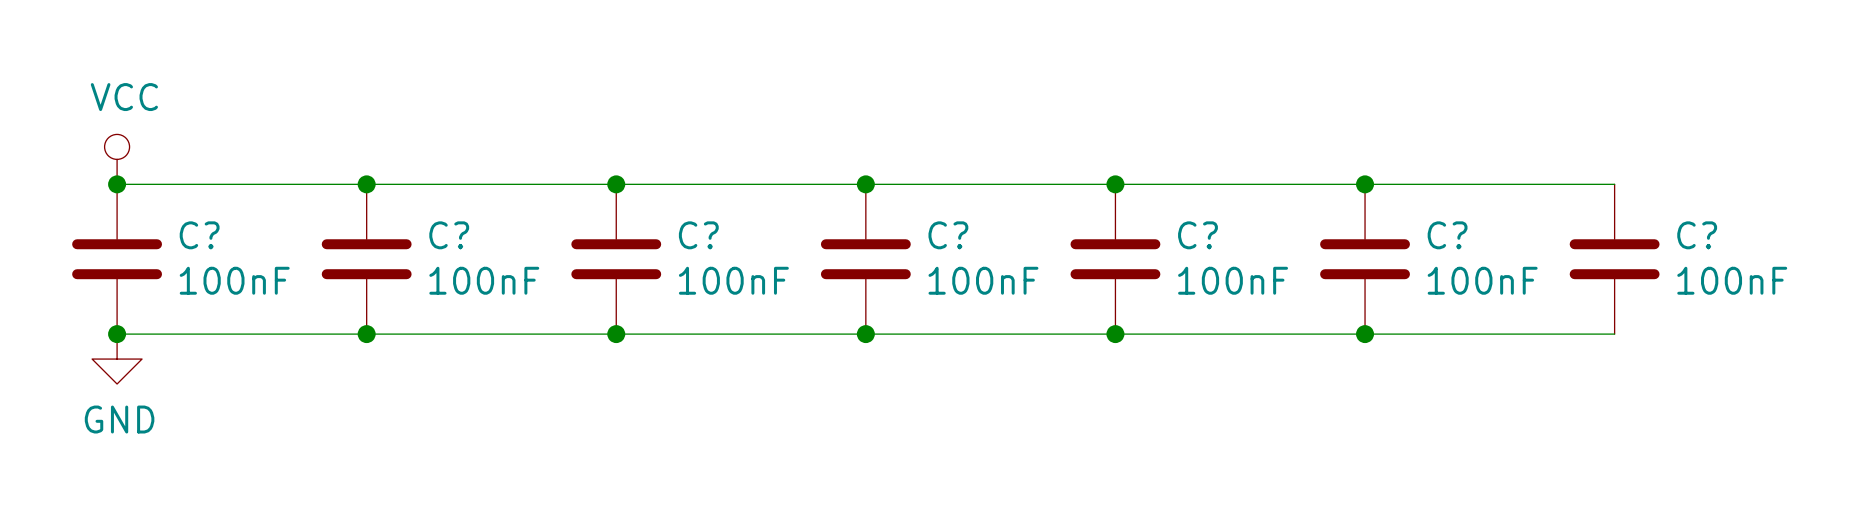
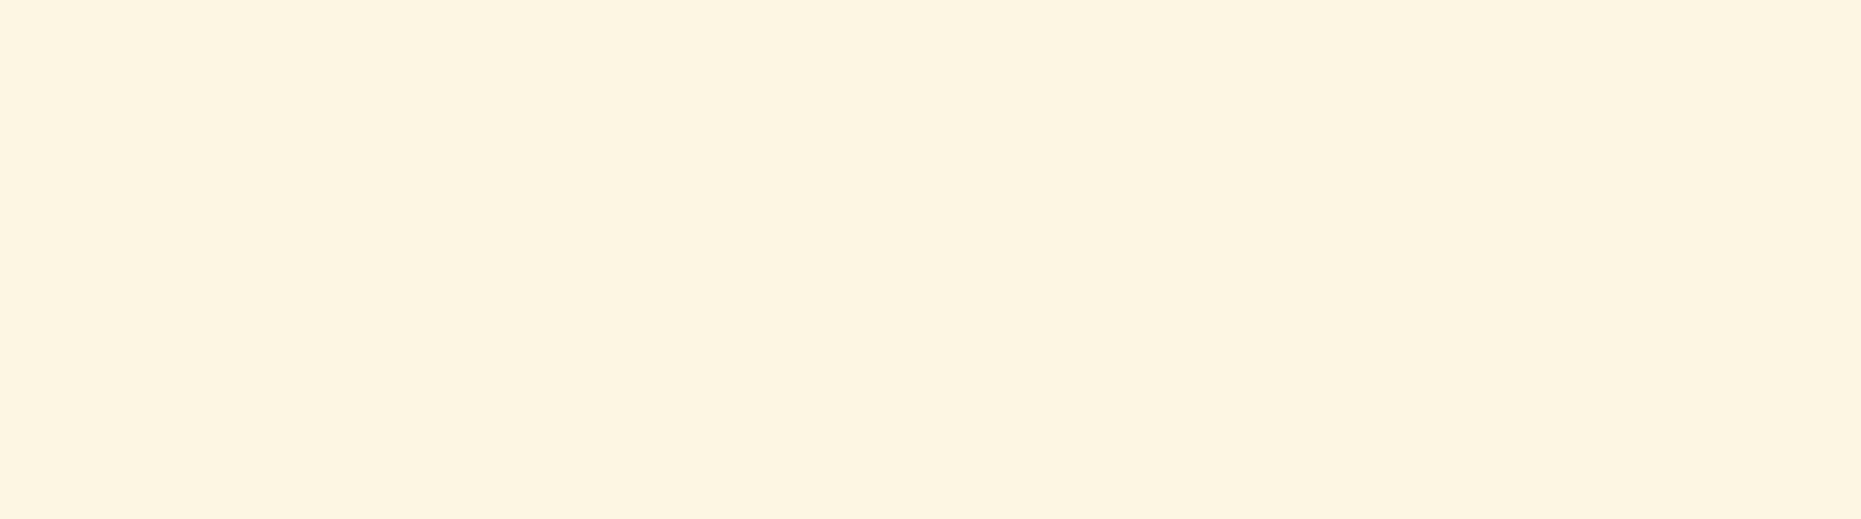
power symbol: VCC (117, 159) -> none
wire: (117, 184) (1614, 184) -> none
junction: (117, 184) -> none
junction: (366, 184) -> none
junction: (616, 184) -> none
junction: (865, 184) -> none
junction: (1115, 184) -> none
junction: (1365, 184) -> none
C?: 100nF (117, 259) -> none
C?: 100nF (366, 259) -> none
C?: 100nF (616, 259) -> none
C?: 100nF (865, 259) -> none
C?: 100nF (1115, 259) -> none
C?: 100nF (1365, 259) -> none
C?: 100nF (1614, 259) -> none
wire: (117, 334) (1614, 334) -> none
junction: (117, 334) -> none
junction: (366, 334) -> none
junction: (616, 334) -> none
junction: (865, 334) -> none
junction: (1115, 334) -> none
junction: (1365, 334) -> none
power symbol: GND (117, 359) -> none

